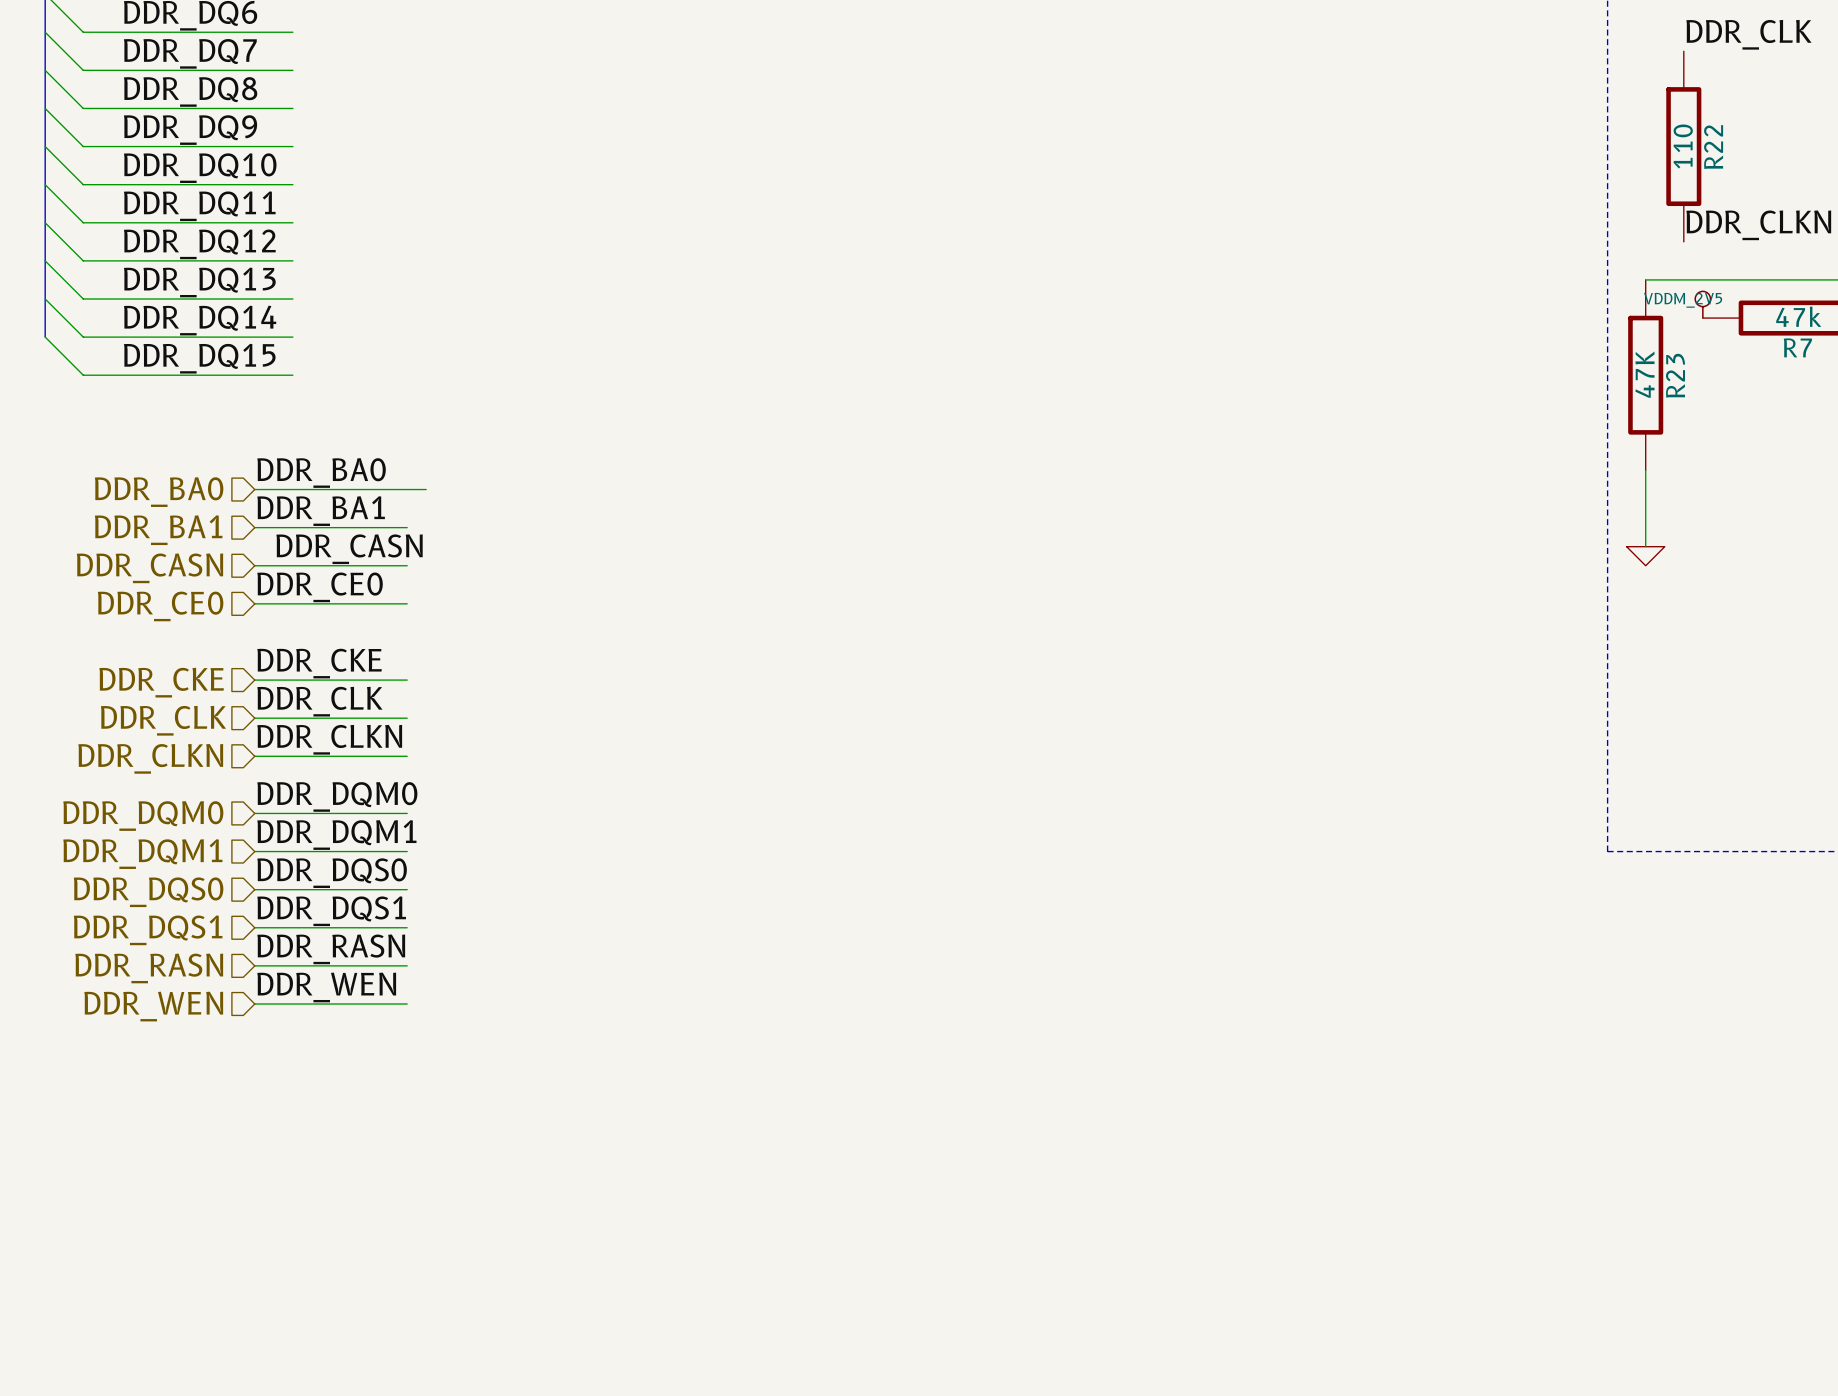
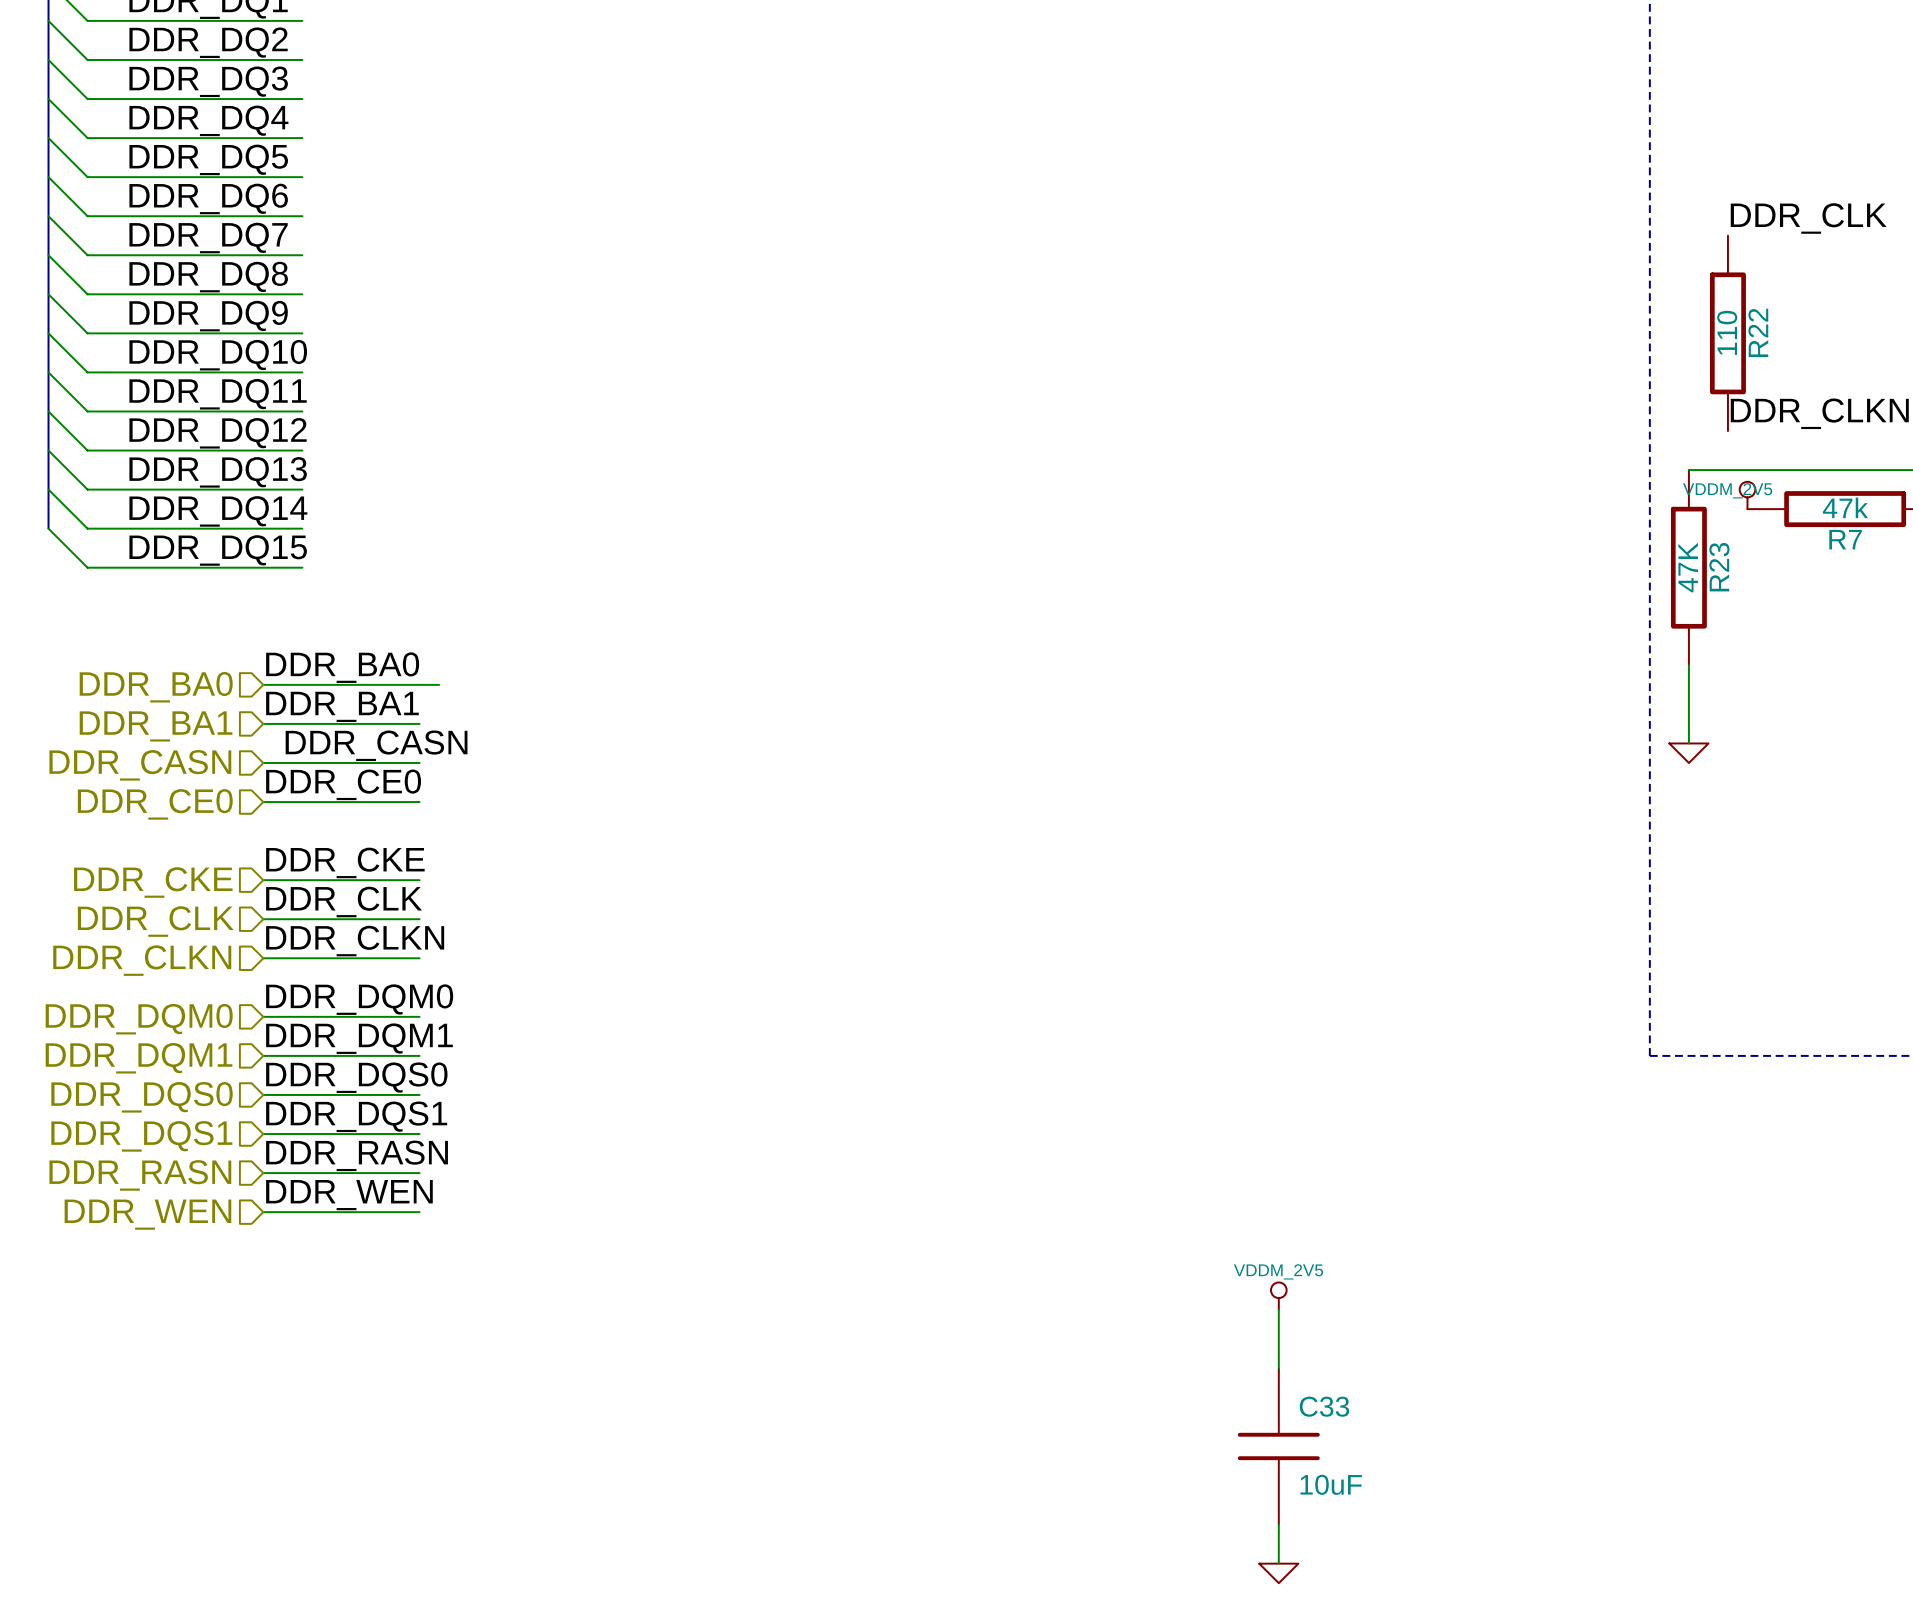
power symbol: none -> VDDM_2V5 (1278, 1296)
wire: none -> (1278, 1309) (1278, 1368)
C33: none -> 10uF (1278, 1446)
wire: none -> (1278, 1524) (1278, 1563)
power symbol: none -> (1278, 1573)

